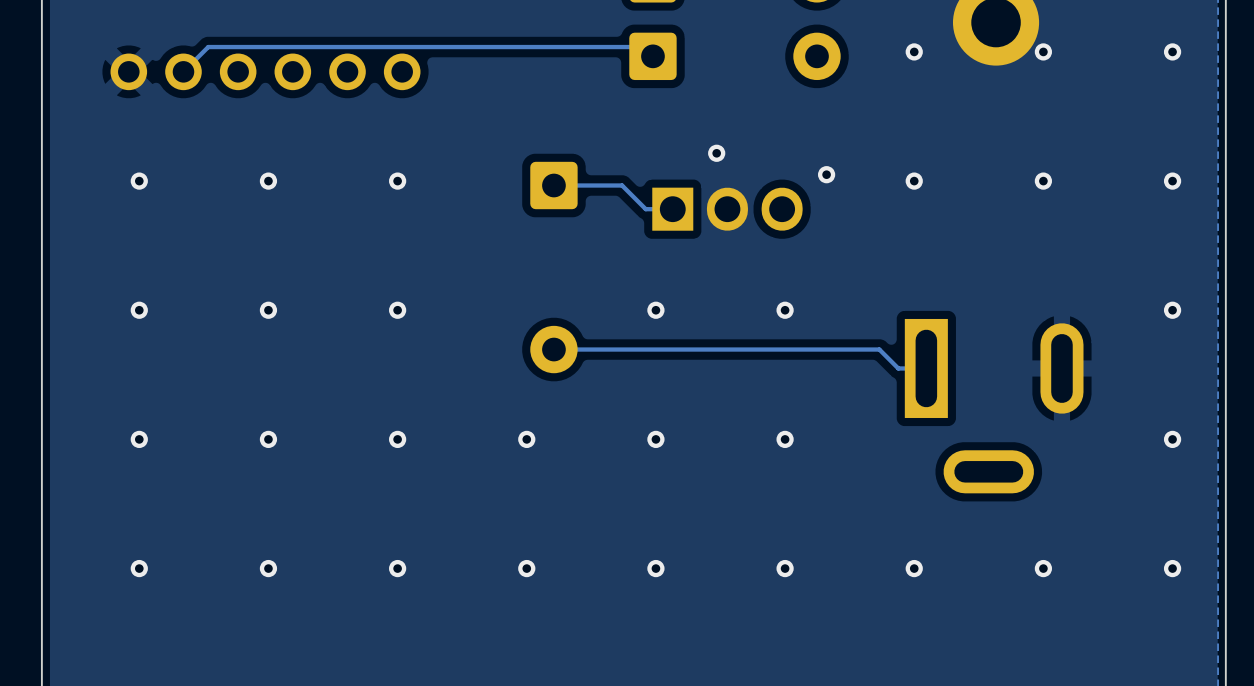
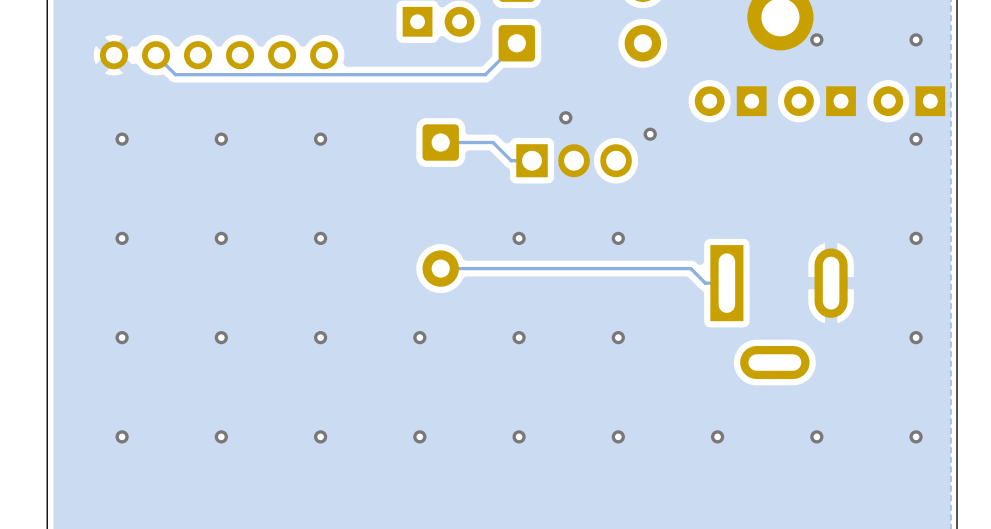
part: none -> (438, 21)
via: (914, 51) -> none
track: (652, 56) (643, 47) (208, 47) (183, 71) -> (516, 43) (485, 74) (175, 74) (156, 55)
part: none -> (730, 101)
part: none -> (820, 101)
part: none -> (909, 101)
via: (914, 181) -> none
via: (1043, 181) -> none

